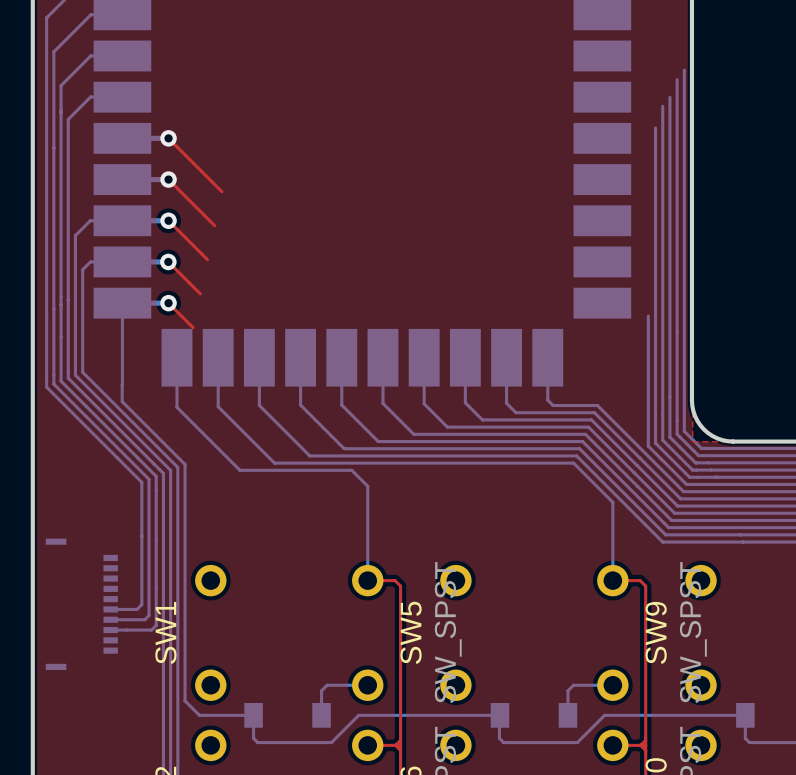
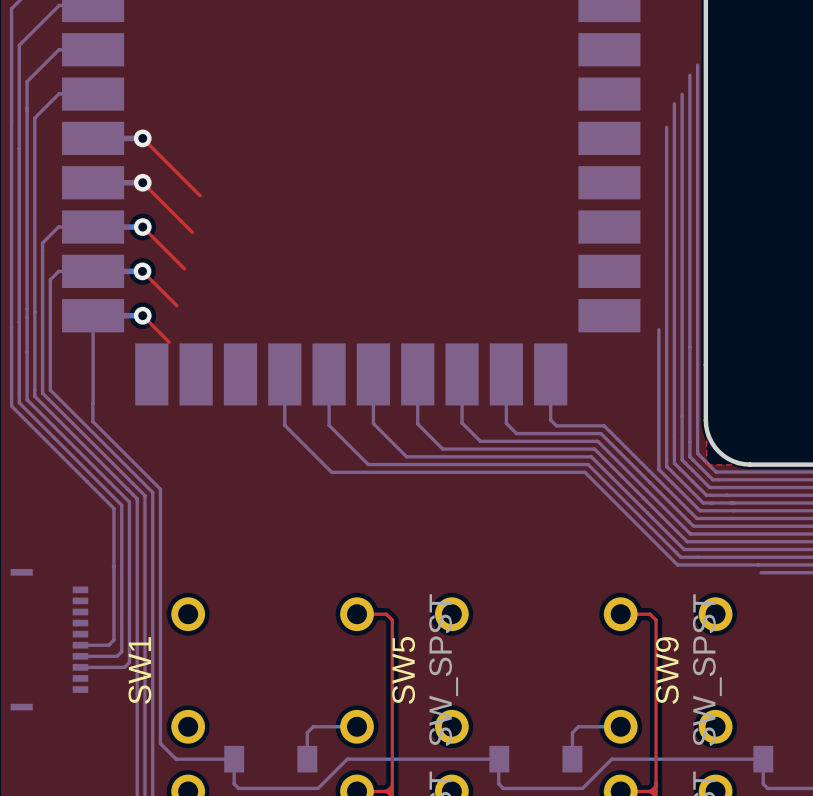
bottom track: (177, 357) (177, 407) (239, 470) (351, 470) (367, 486) (367, 580) -> none
bottom track: (218, 357) (218, 406) (274, 463) (573, 463) (612, 502) (612, 580) -> none
bottom track: (259, 357) (259, 405) (309, 455) (576, 455) (662, 542) (743, 542) -> none

